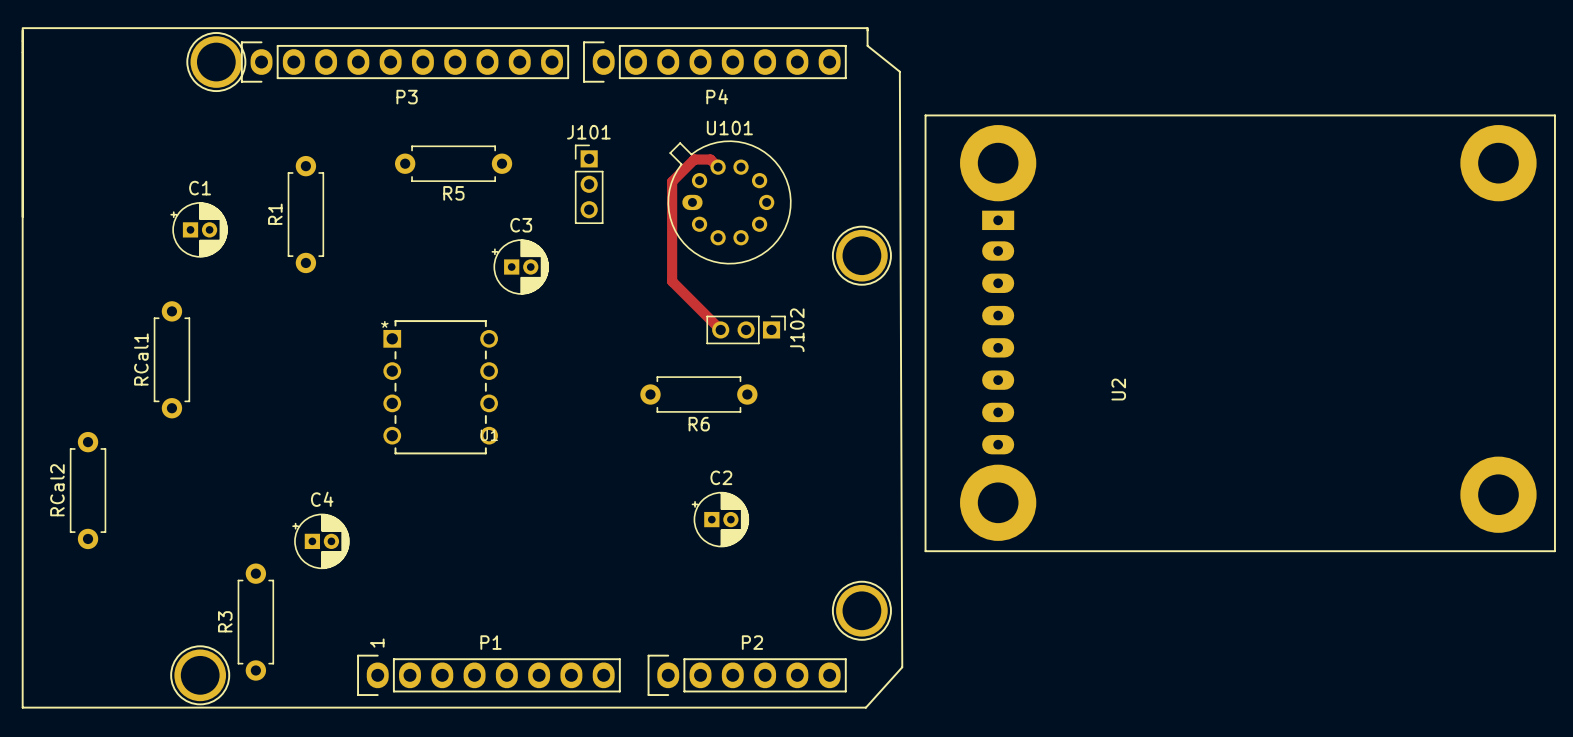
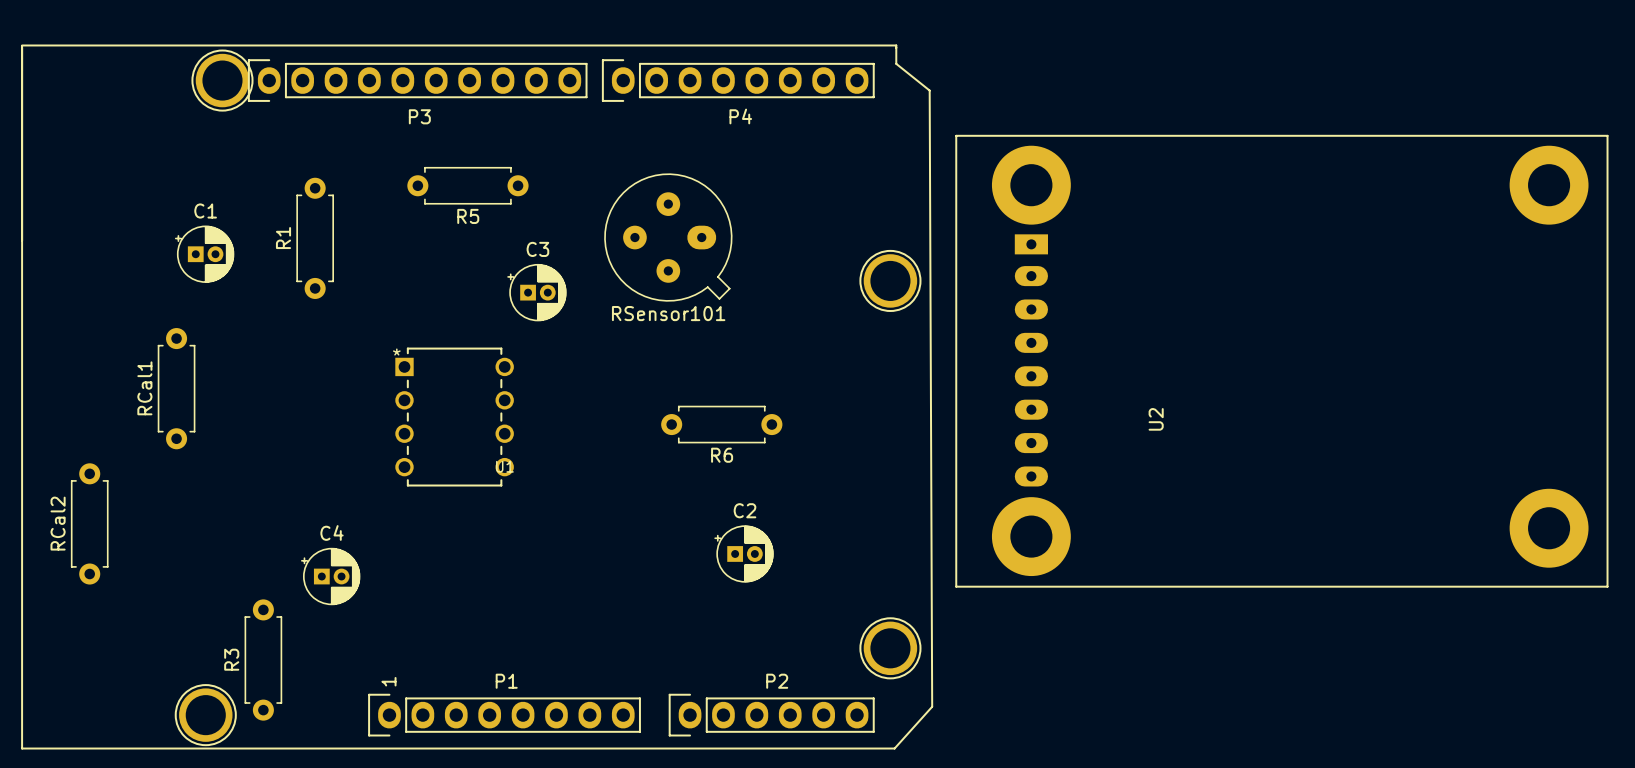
track: (718, 167) (710, 159) (694, 159) (672, 181) (672, 281) (720, 329) -> none
J101: (589, 184) -> none
U101: (729, 202) -> none
RSensor101: none -> (668, 237)
J102: (746, 329) -> none

